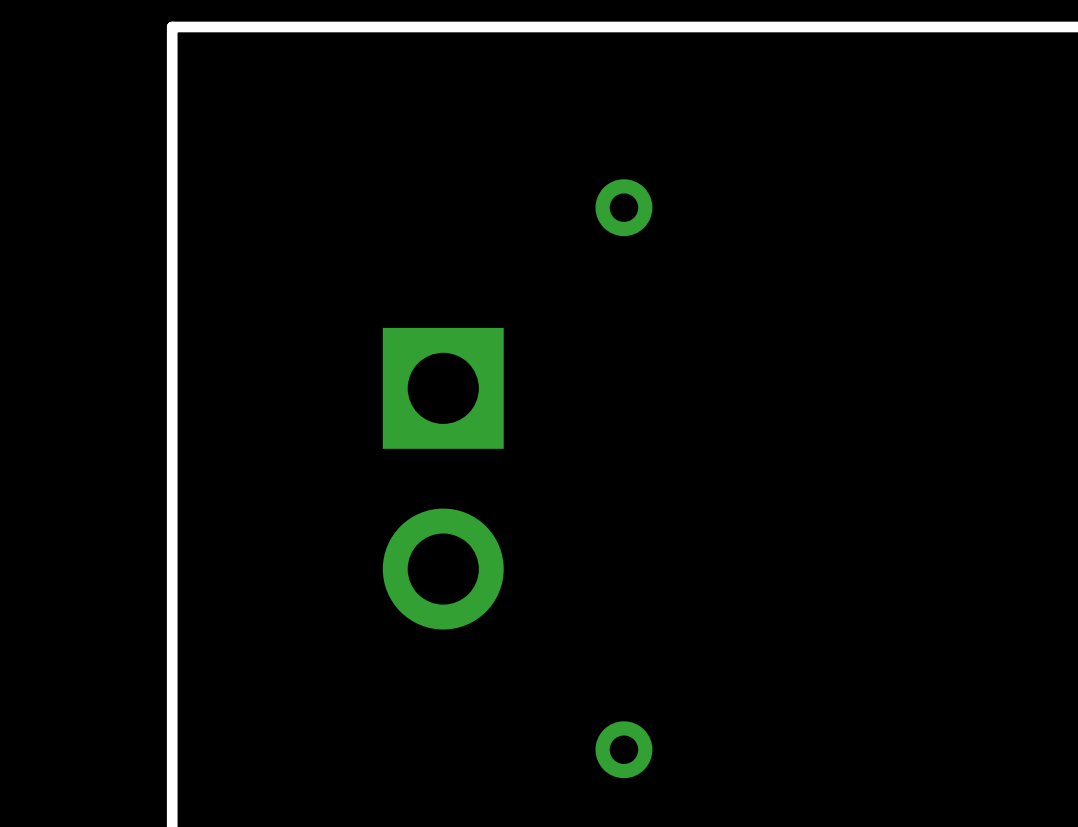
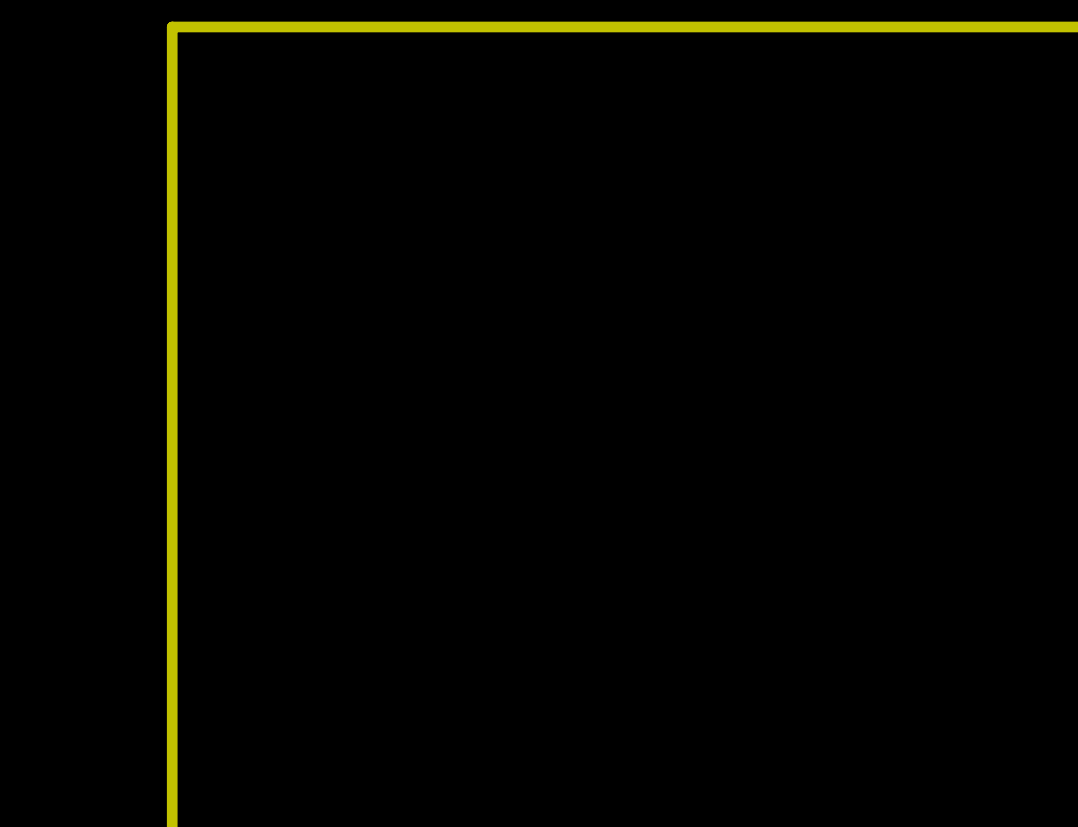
via: (623, 207) -> none
part: (443, 478) -> none
via: (623, 749) -> none

